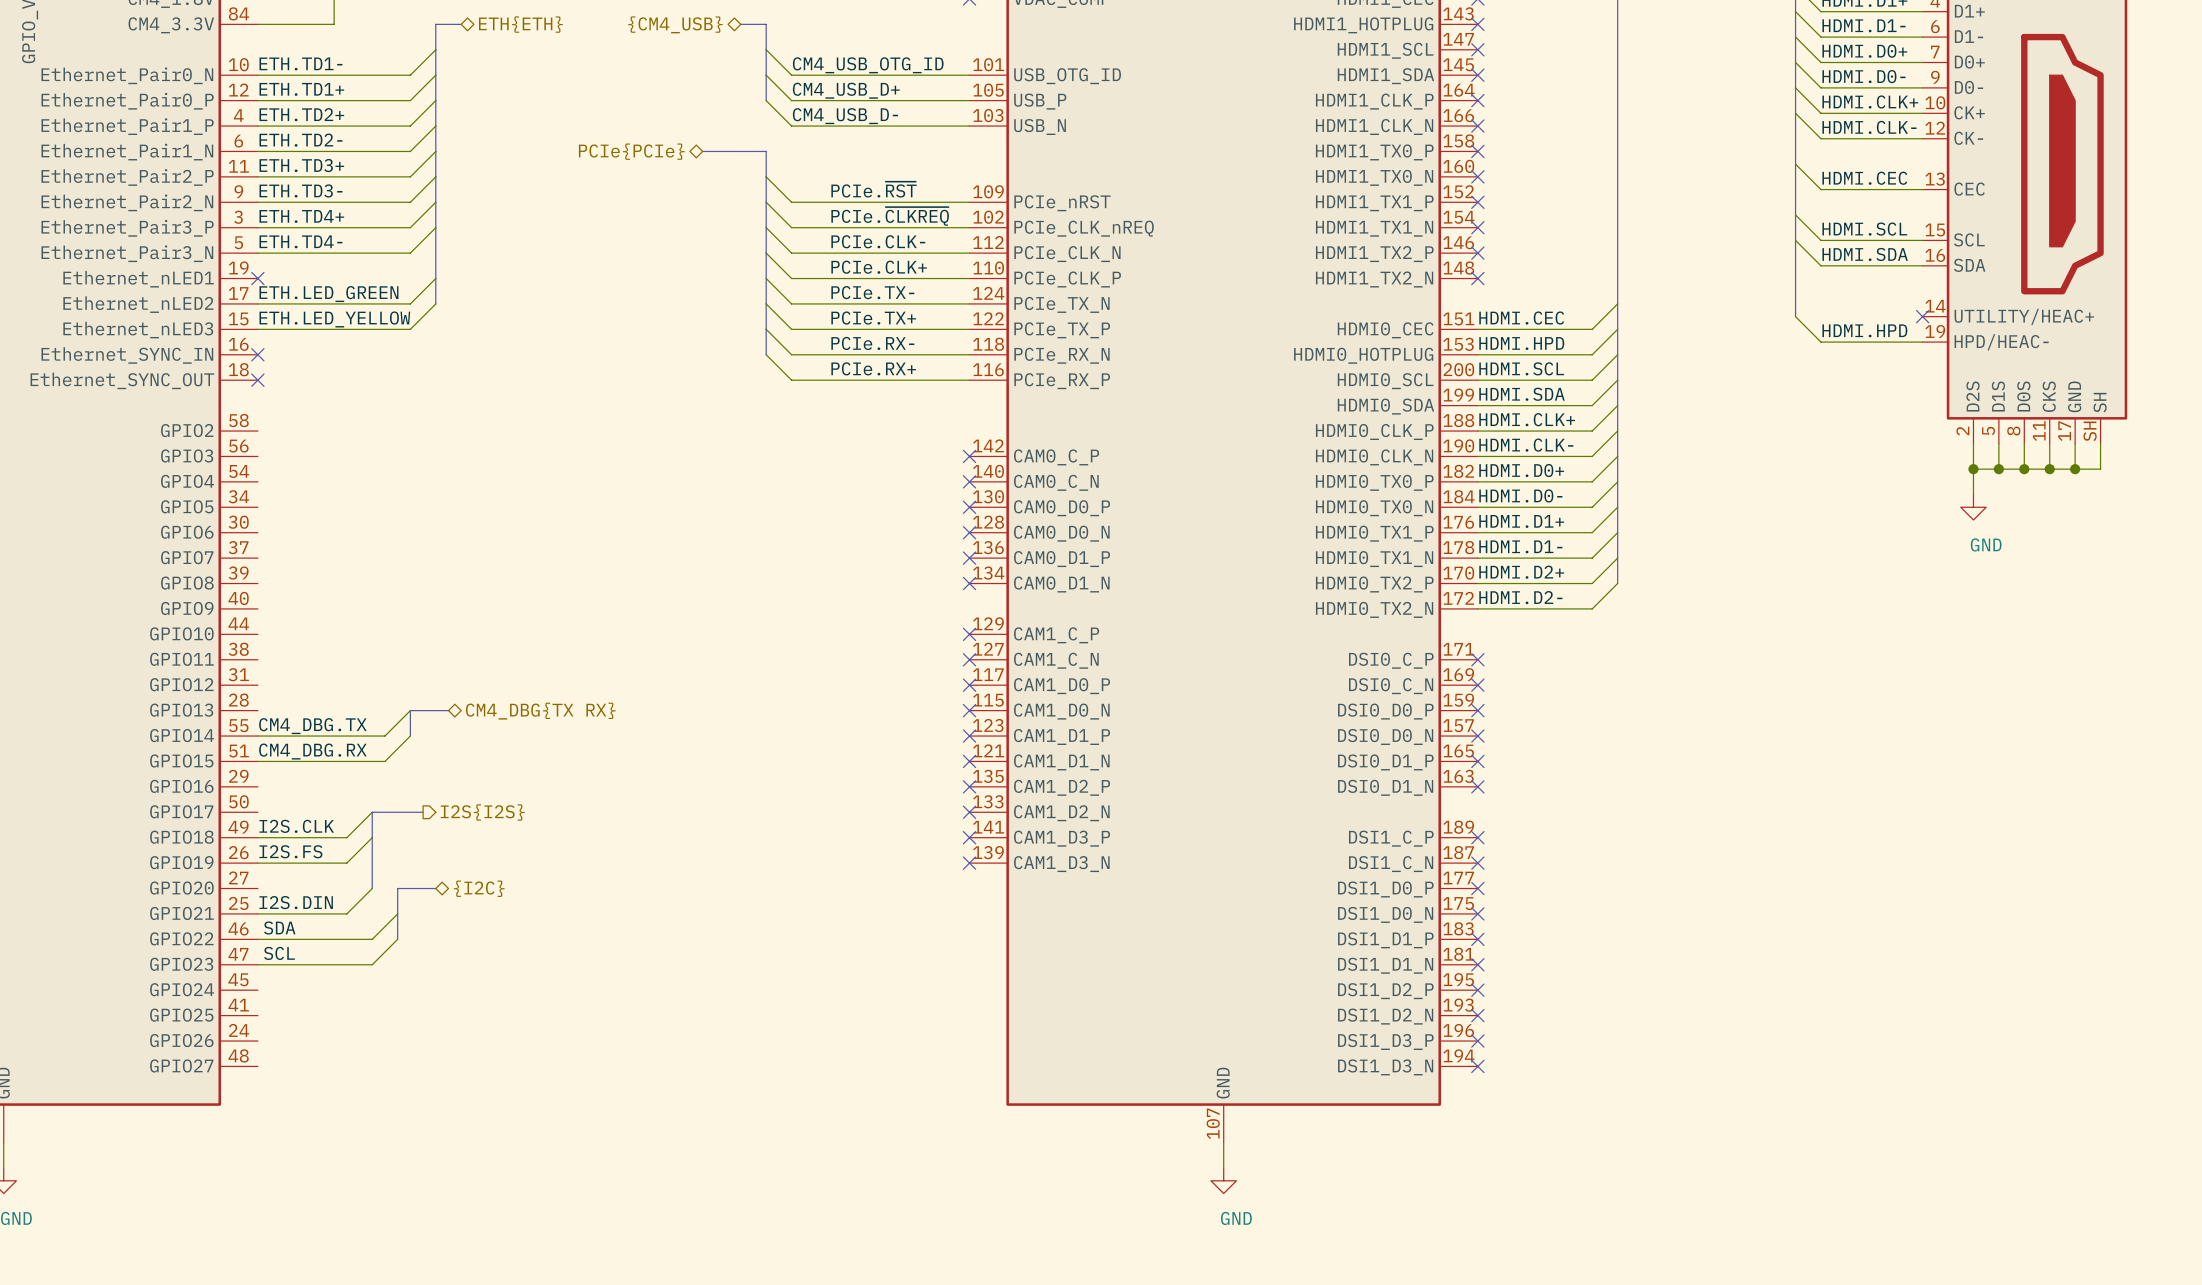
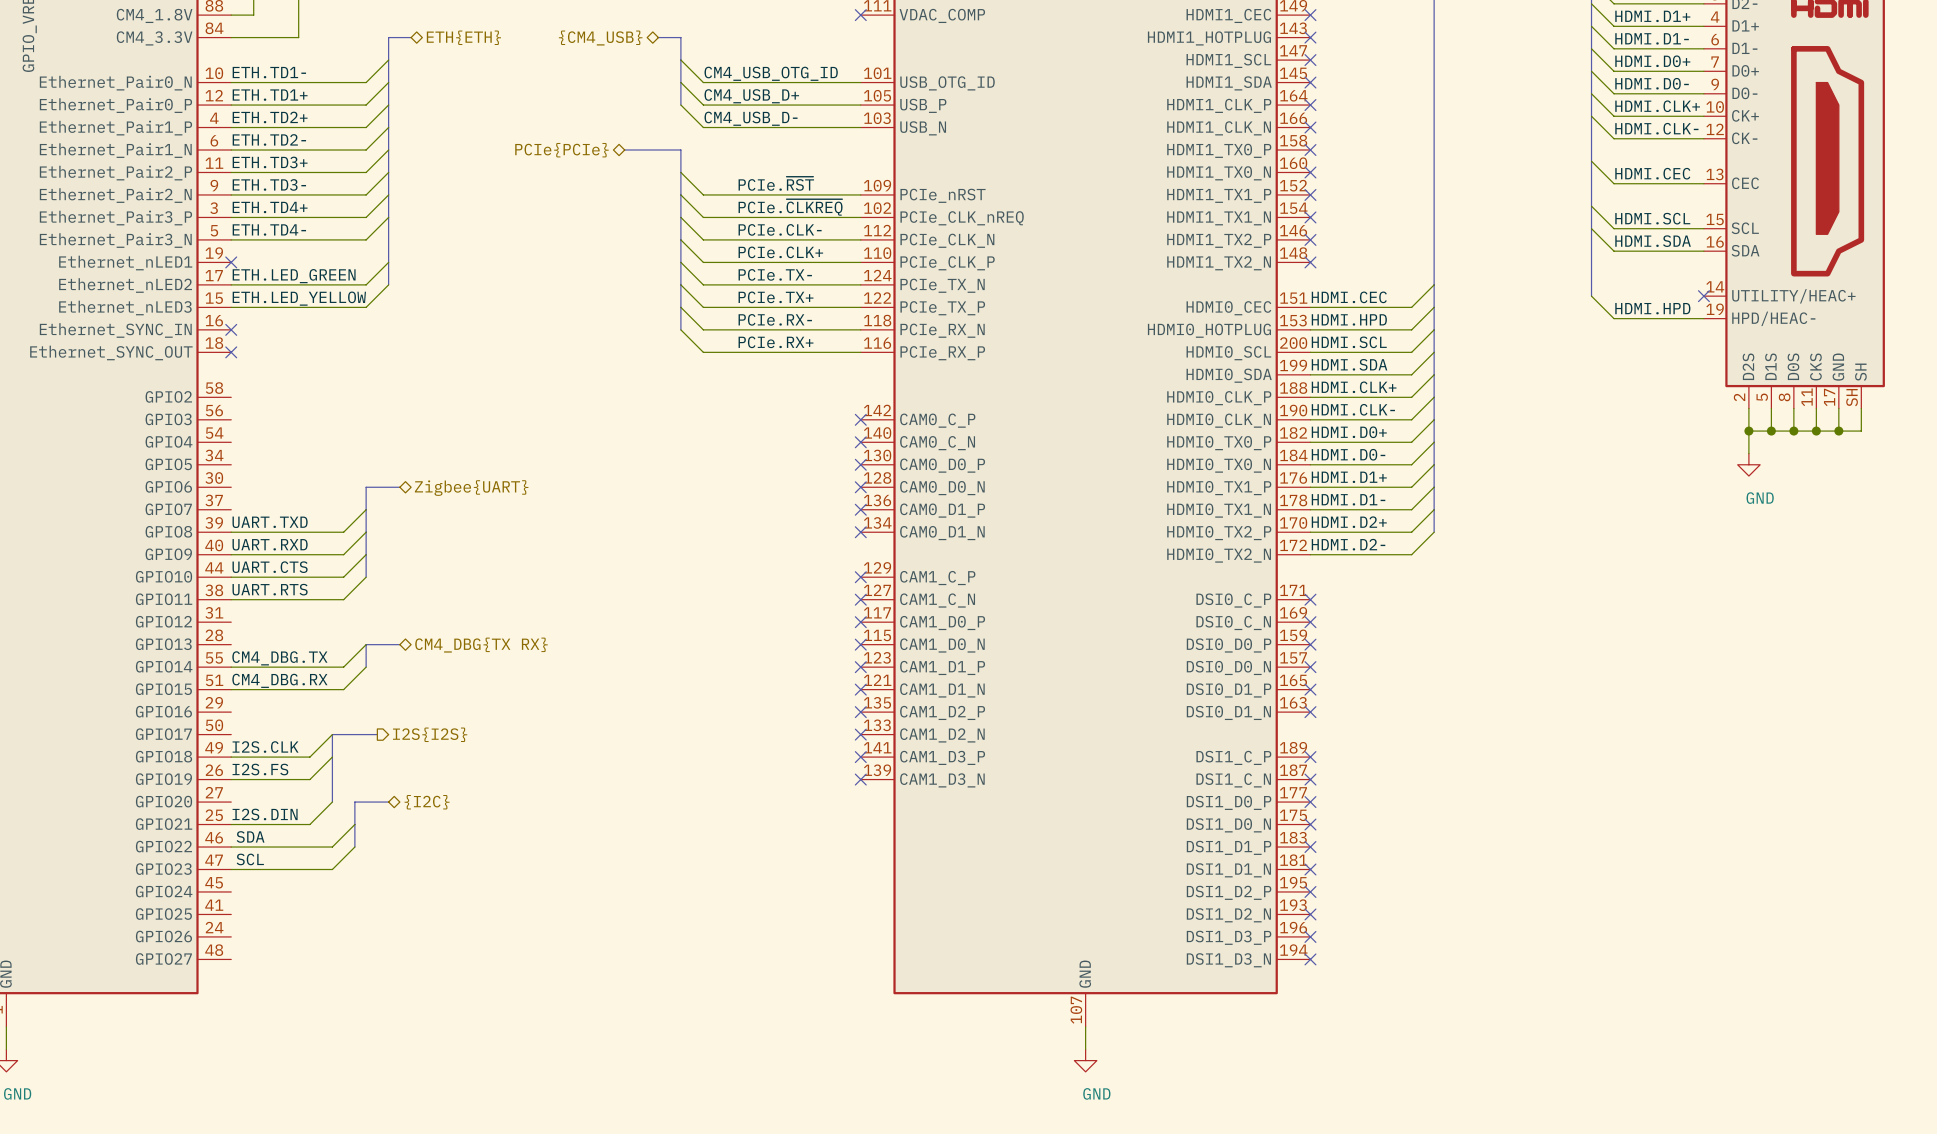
bus: none -> (399, 487) (366, 487) (366, 577)
hierarchical label: none -> Zigbee{UART} (471, 488)
wire: none -> (366, 509) (343, 532) (231, 532)
label: none -> UART.TXD (270, 522)
wire: none -> (366, 532) (343, 554) (231, 554)
label: none -> UART.RXD (270, 544)
wire: none -> (366, 554) (343, 577) (231, 577)
label: none -> UART.CTS (270, 567)
wire: none -> (366, 577) (343, 599) (231, 599)
label: none -> UART.RTS (270, 589)

